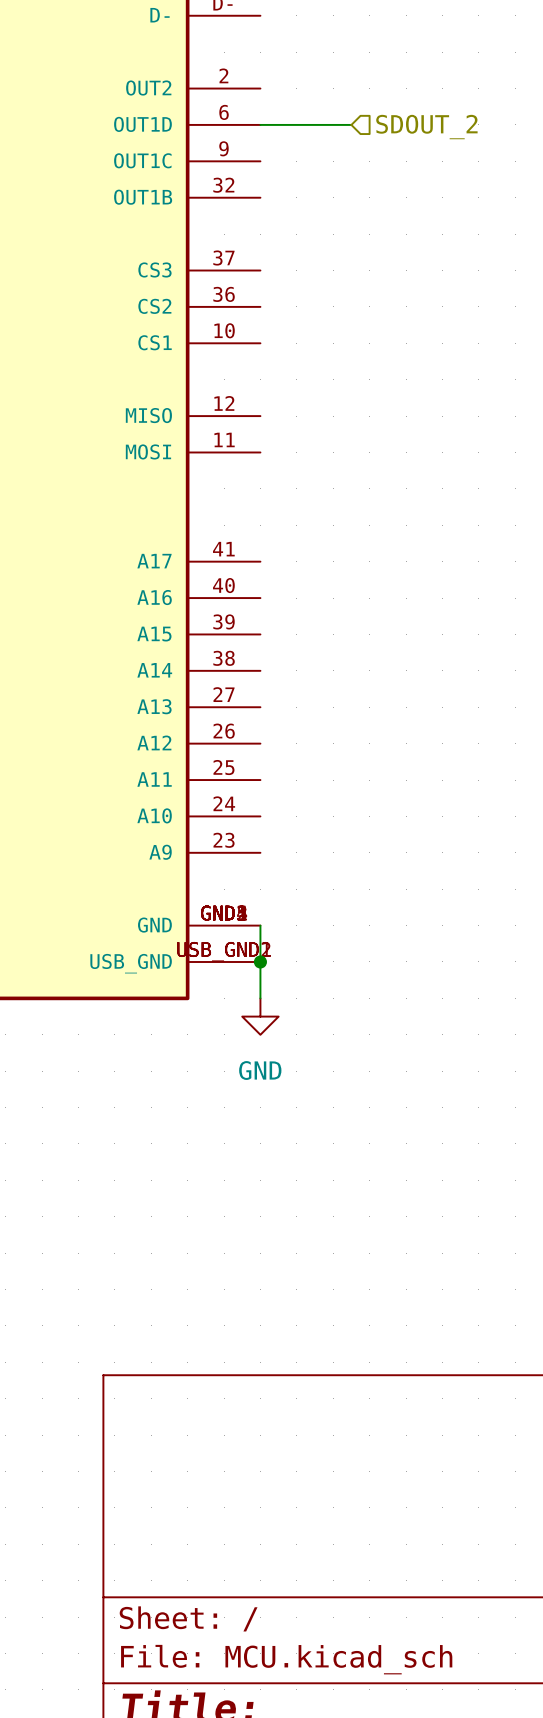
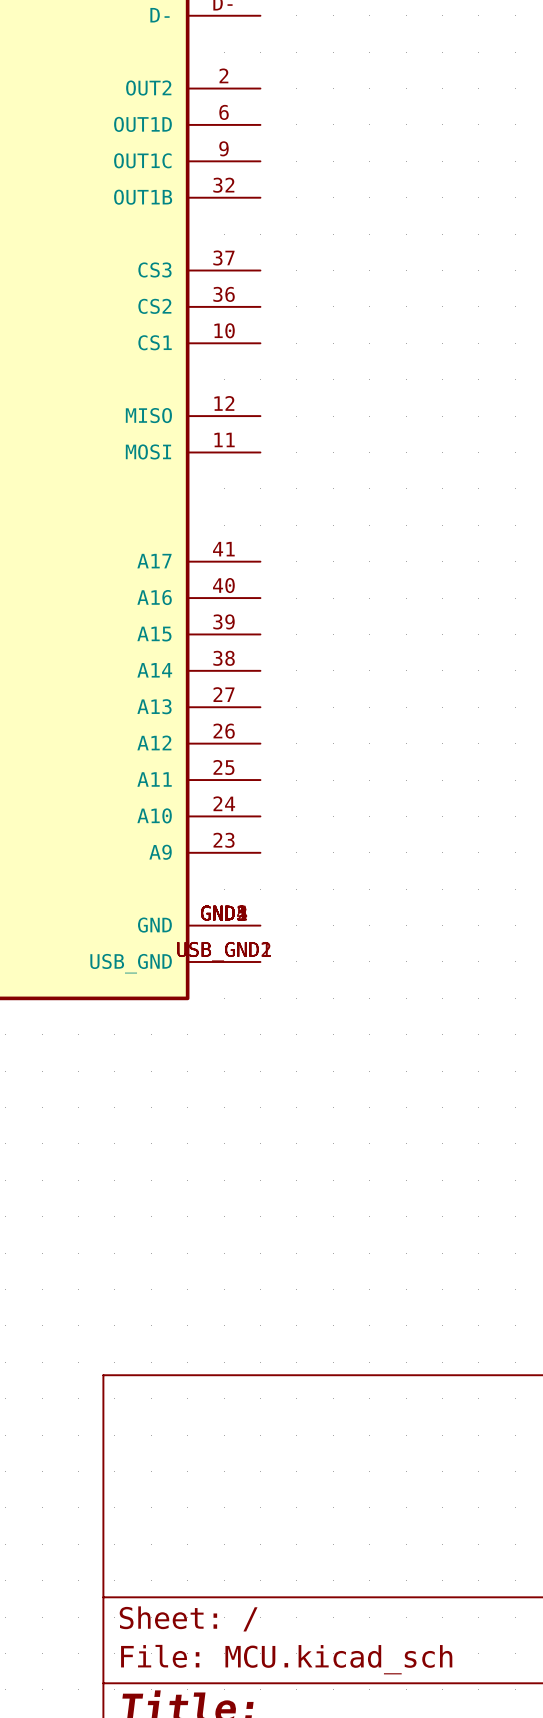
wire: (260, 124) (351, 124) -> none
hierarchical label: SDOUT_2 (426, 127) -> none
wire: (260, 925) (260, 998) -> none
junction: (260, 961) -> none
power symbol: GND (260, 1016) -> none

